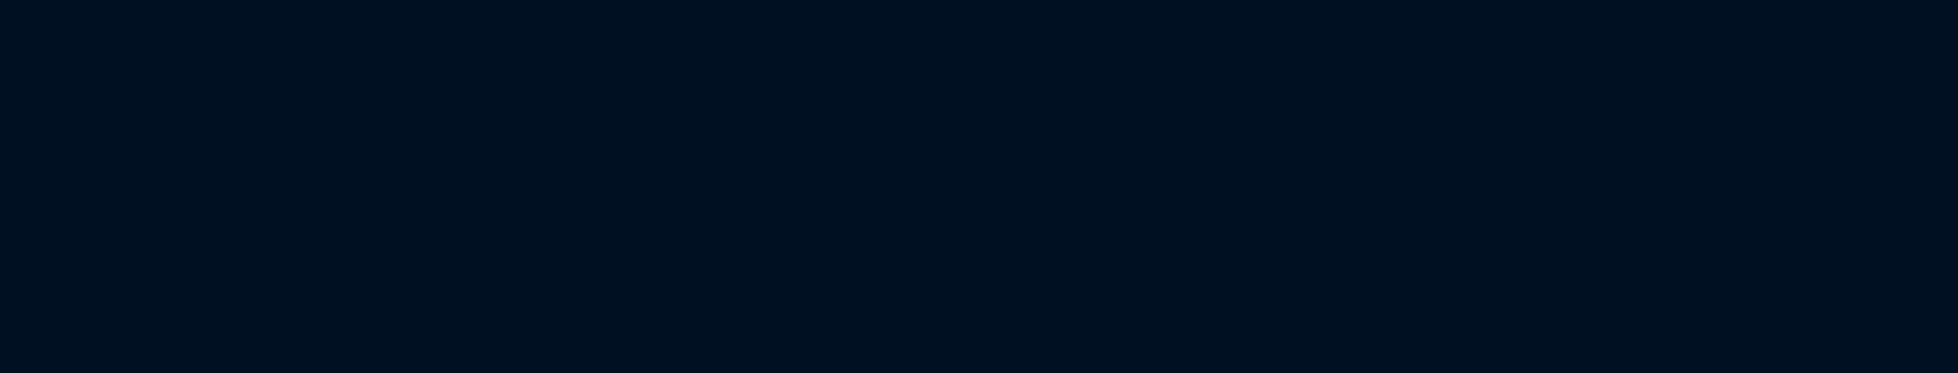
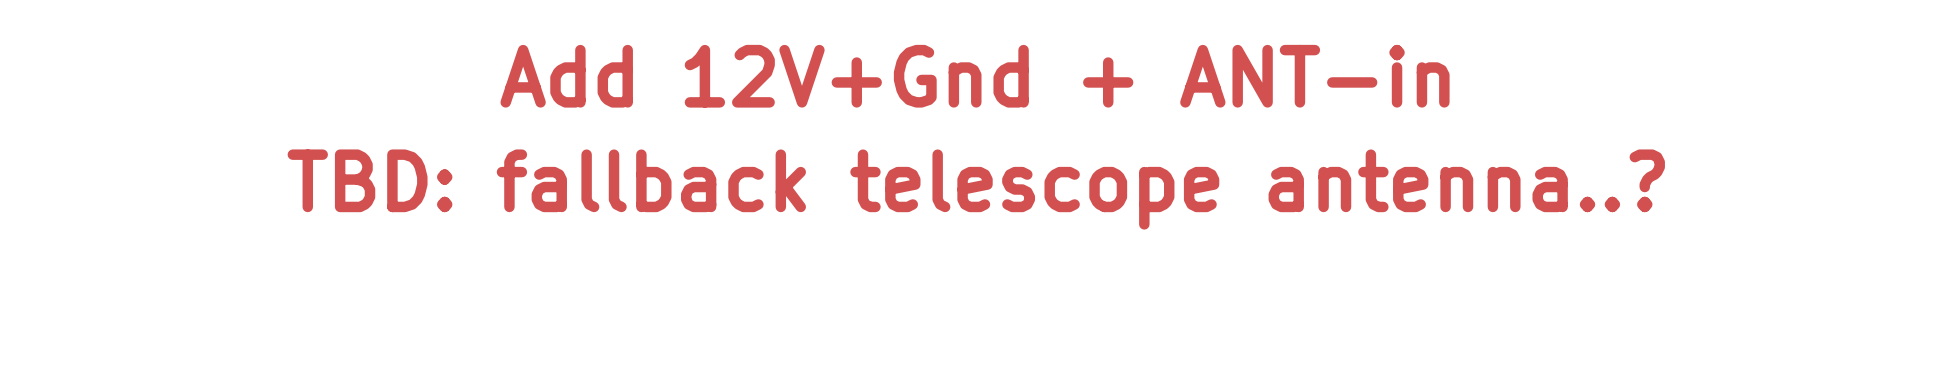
text: none -> Add 12V+Gnd + ANT-in (975, 76)
text: none -> TBD: fallback telescope antenna..? (976, 189)

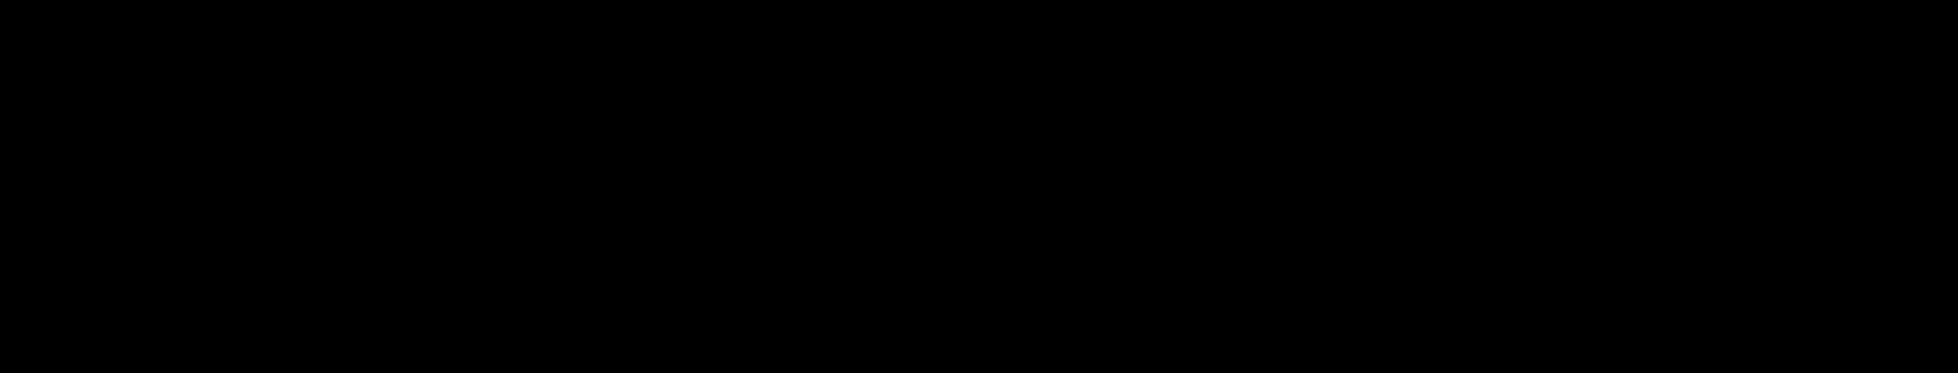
text: Add 12V+Gnd + ANT-in (975, 76) -> none
text: TBD: fallback telescope antenna..? (976, 189) -> none

